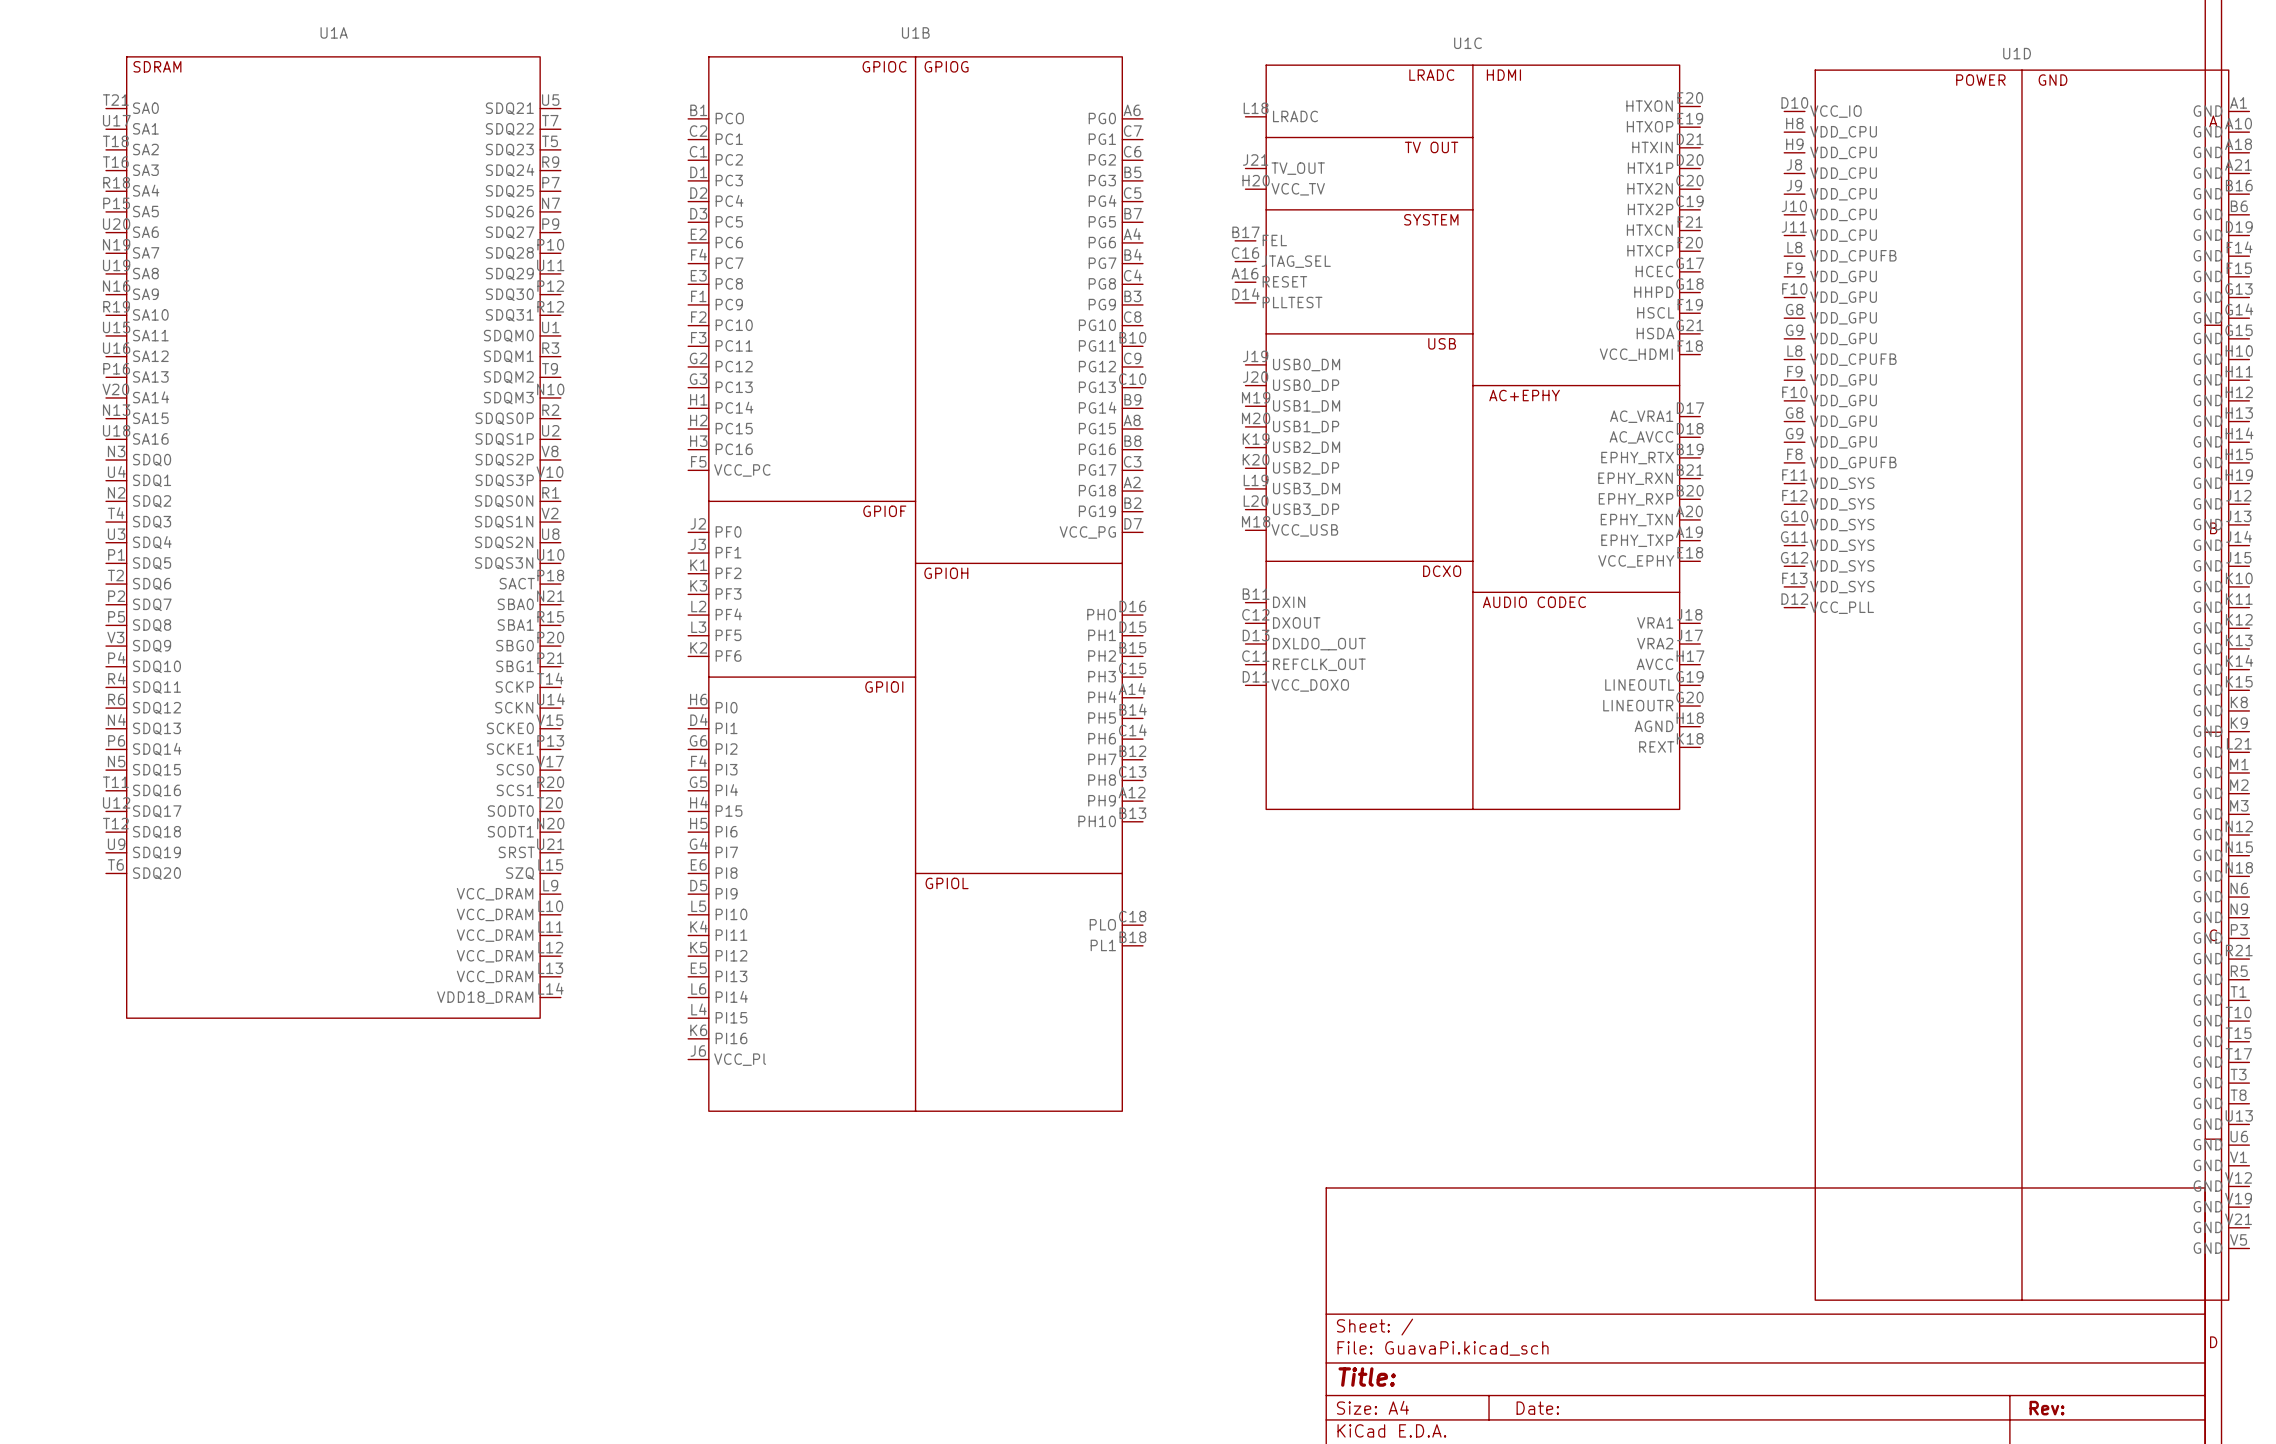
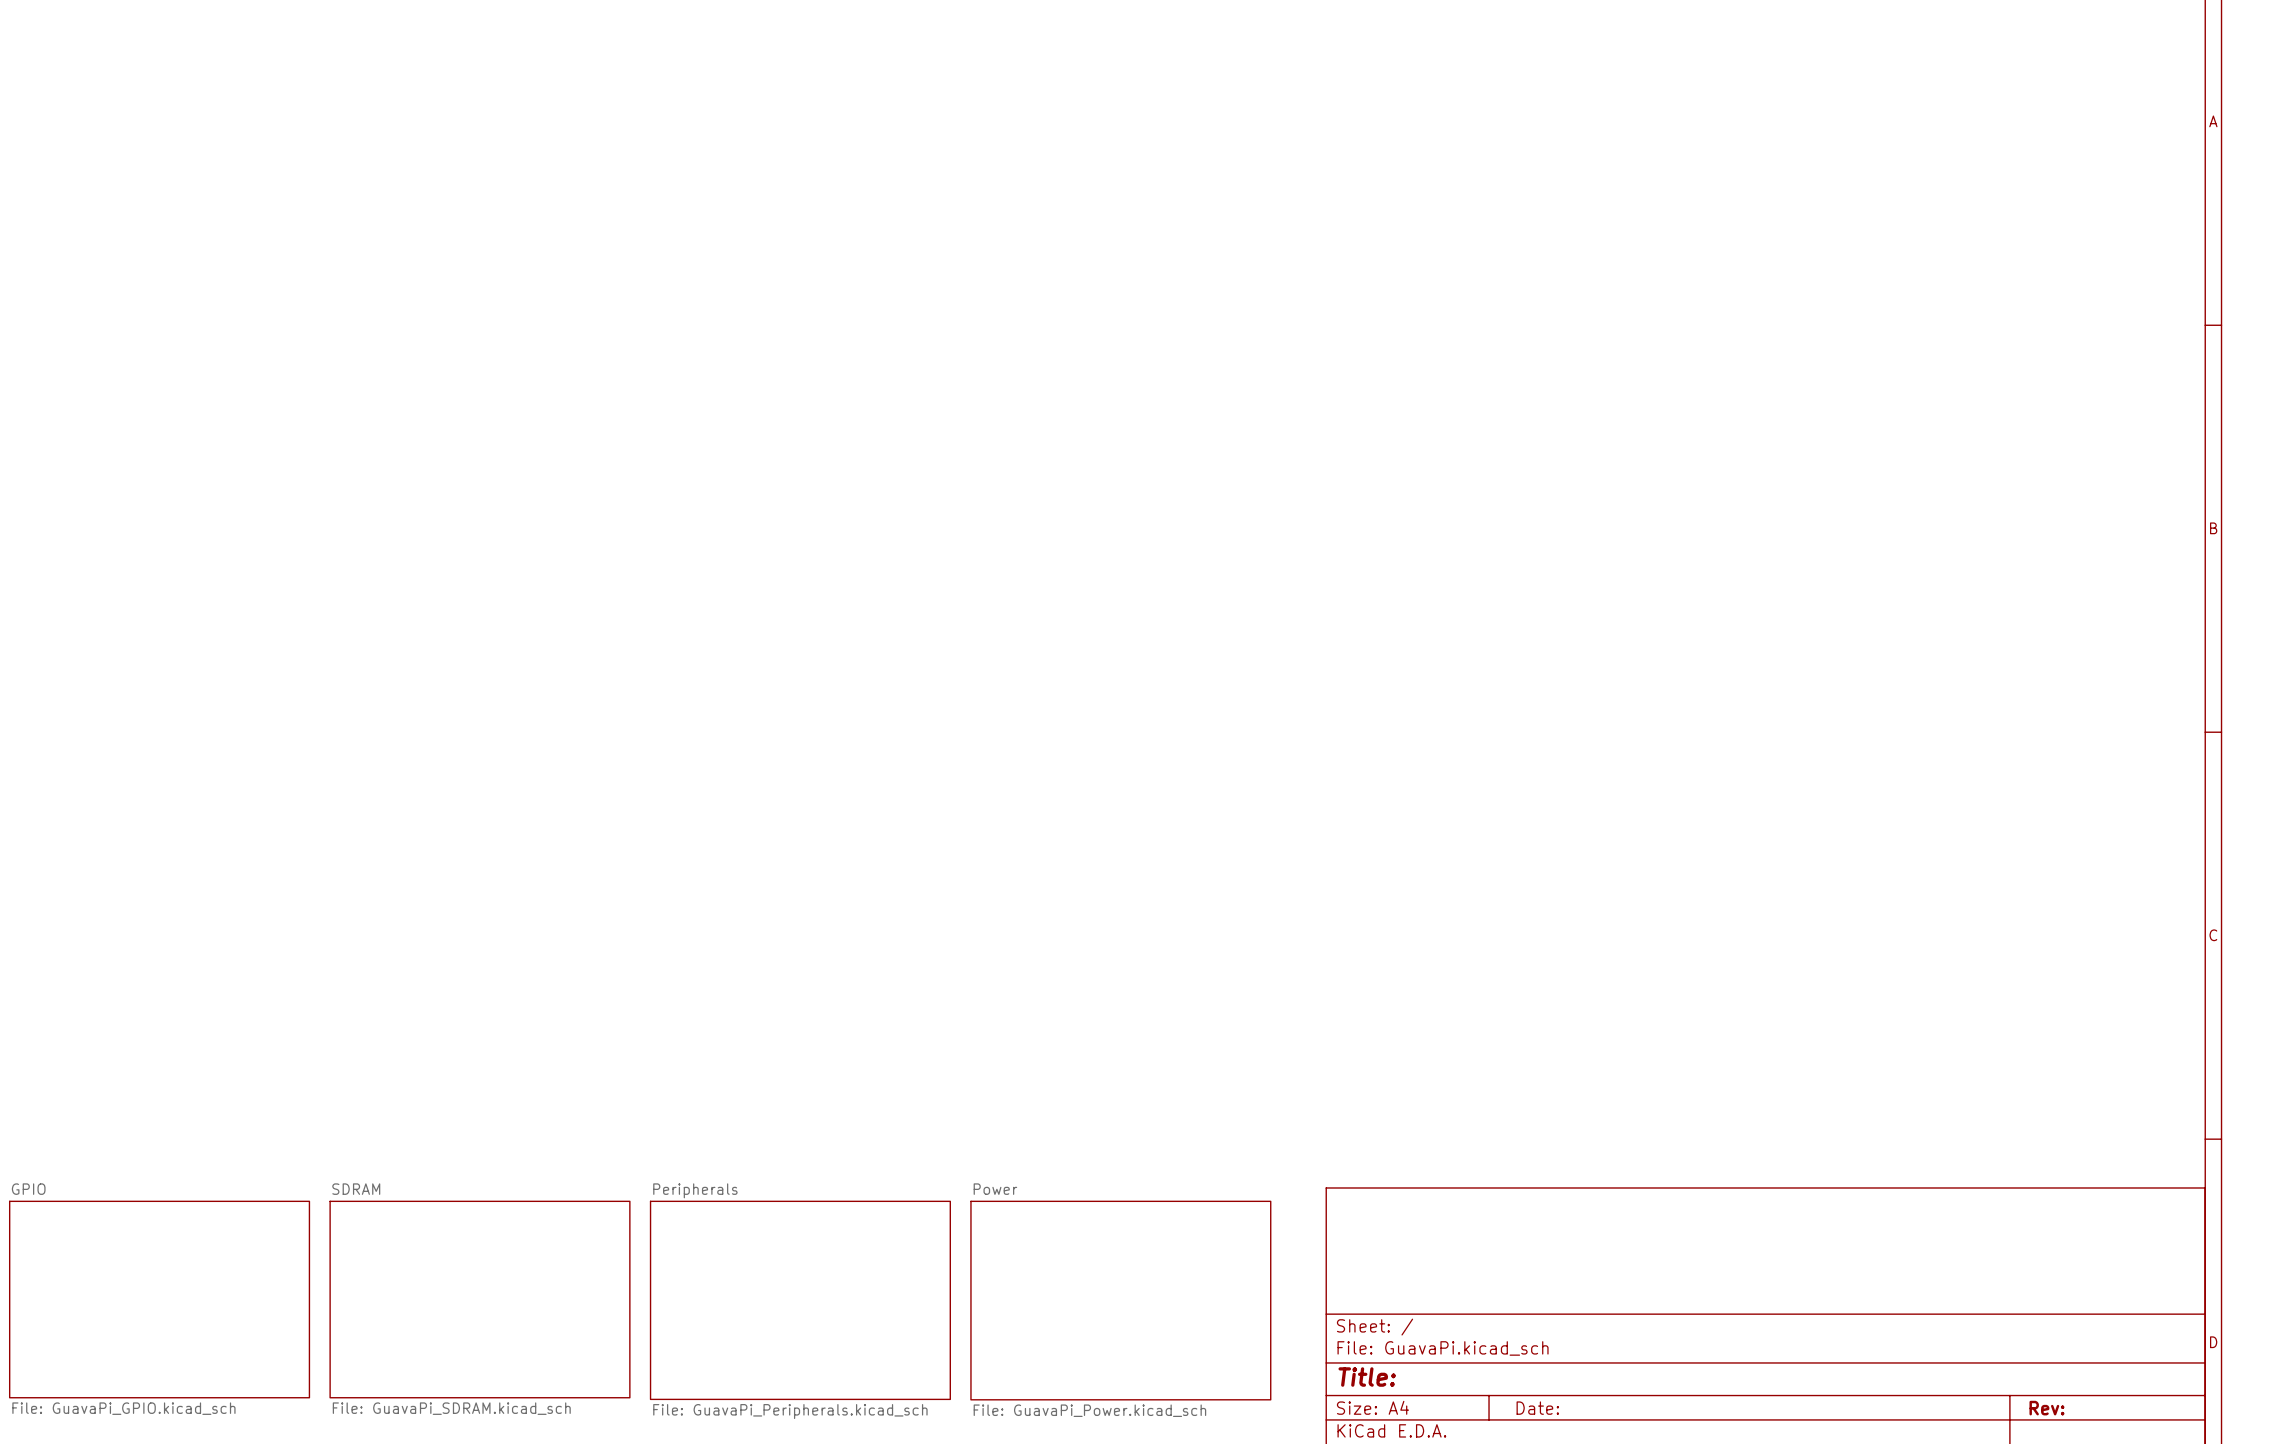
U1C: (1467, 437) -> none
U1A: (333, 537) -> none
U1B: (915, 584) -> none
U1D: (2016, 685) -> none
sheet GPIO: none -> File: GuavaPi_GPIO.kicad_sch (159, 1299)
sheet SDRAM: none -> File: GuavaPi_SDRAM.kicad_sch (479, 1299)
sheet Peripherals: none -> File: GuavaPi_Peripherals.kicad_sch (800, 1300)
sheet Power: none -> File: GuavaPi_Power.kicad_sch (1120, 1300)

